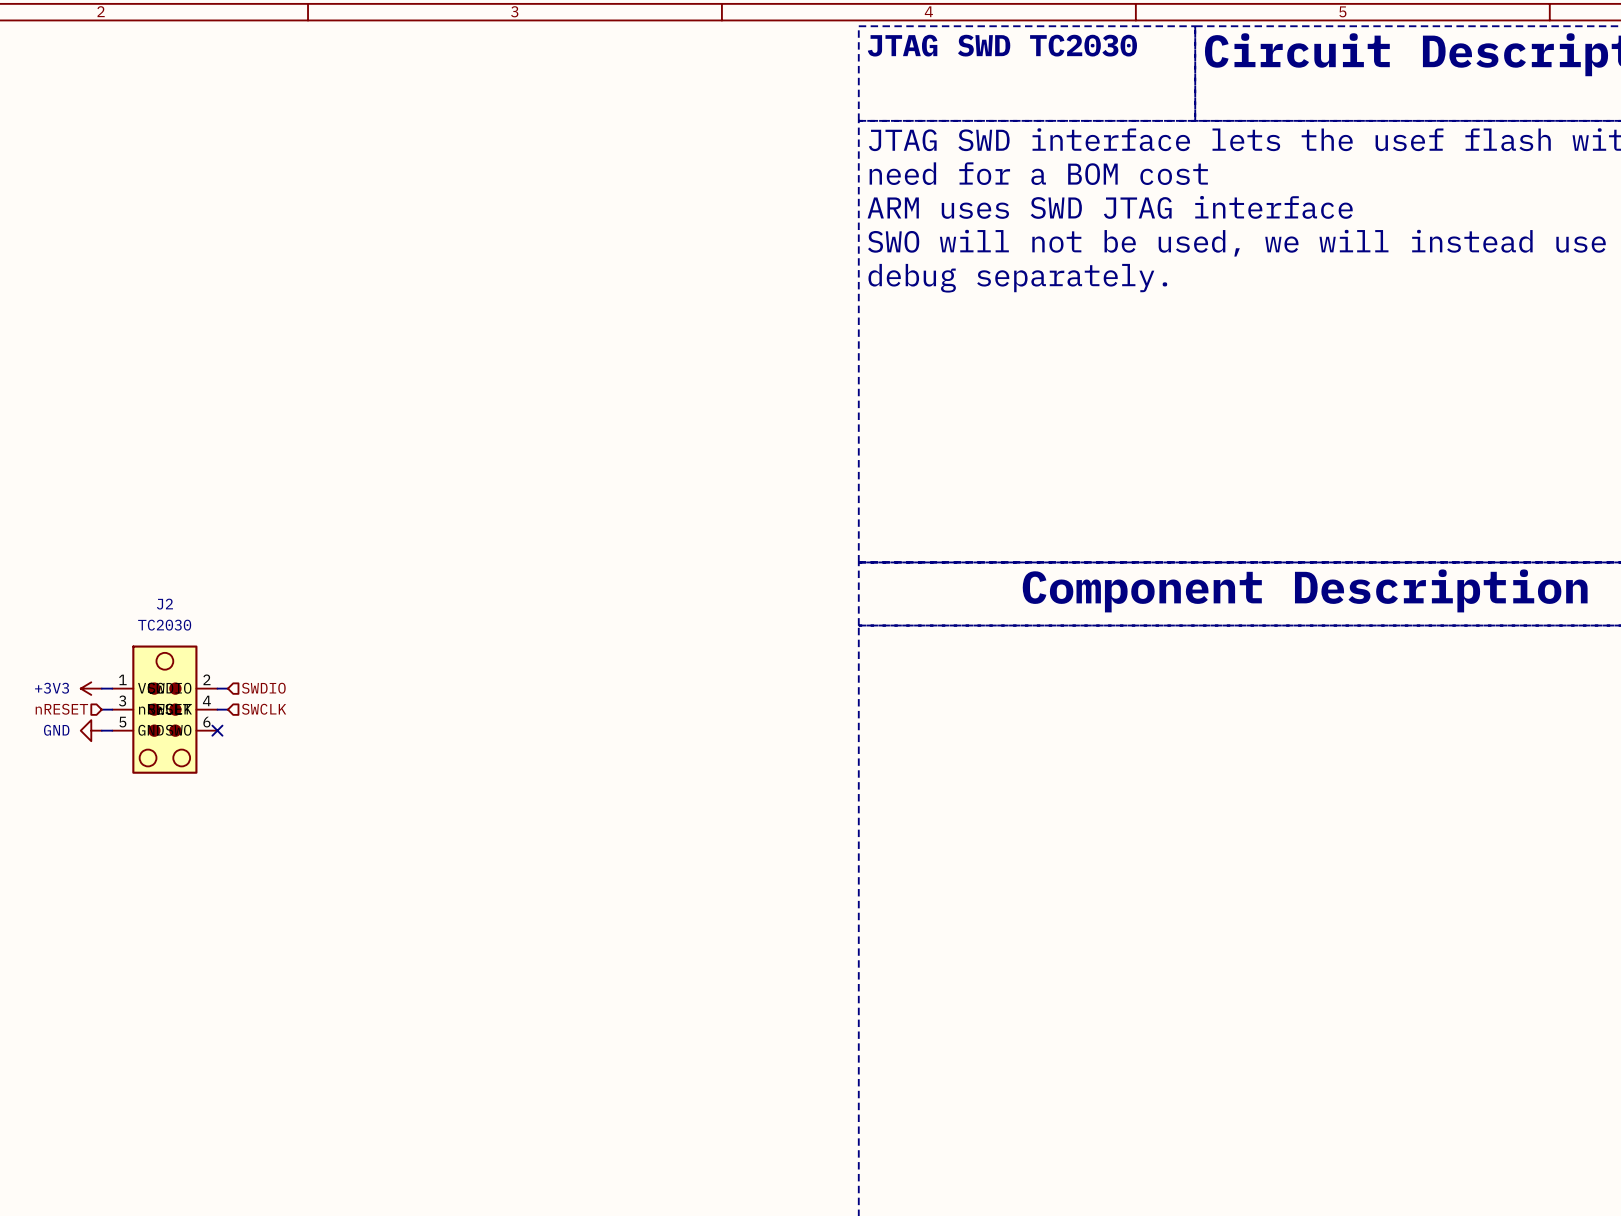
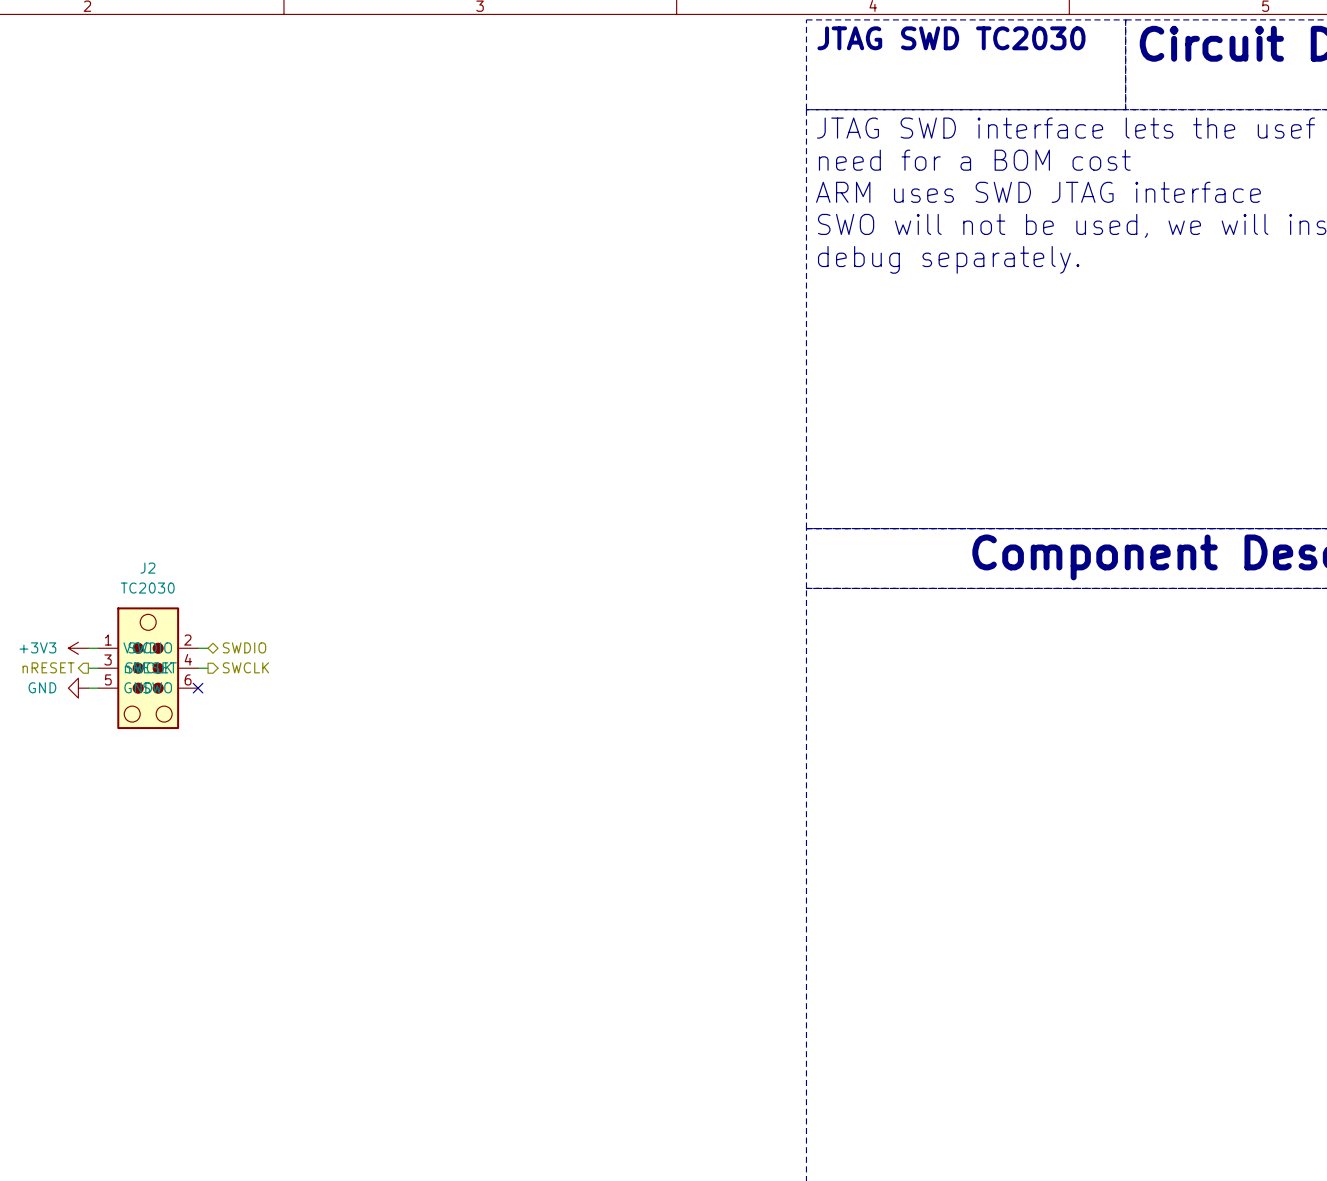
hierarchical label shape: input (263, 688) -> bidirectional (244, 647)
hierarchical label shape: input (61, 709) -> output (48, 667)
hierarchical label shape: input (264, 709) -> output (245, 667)

